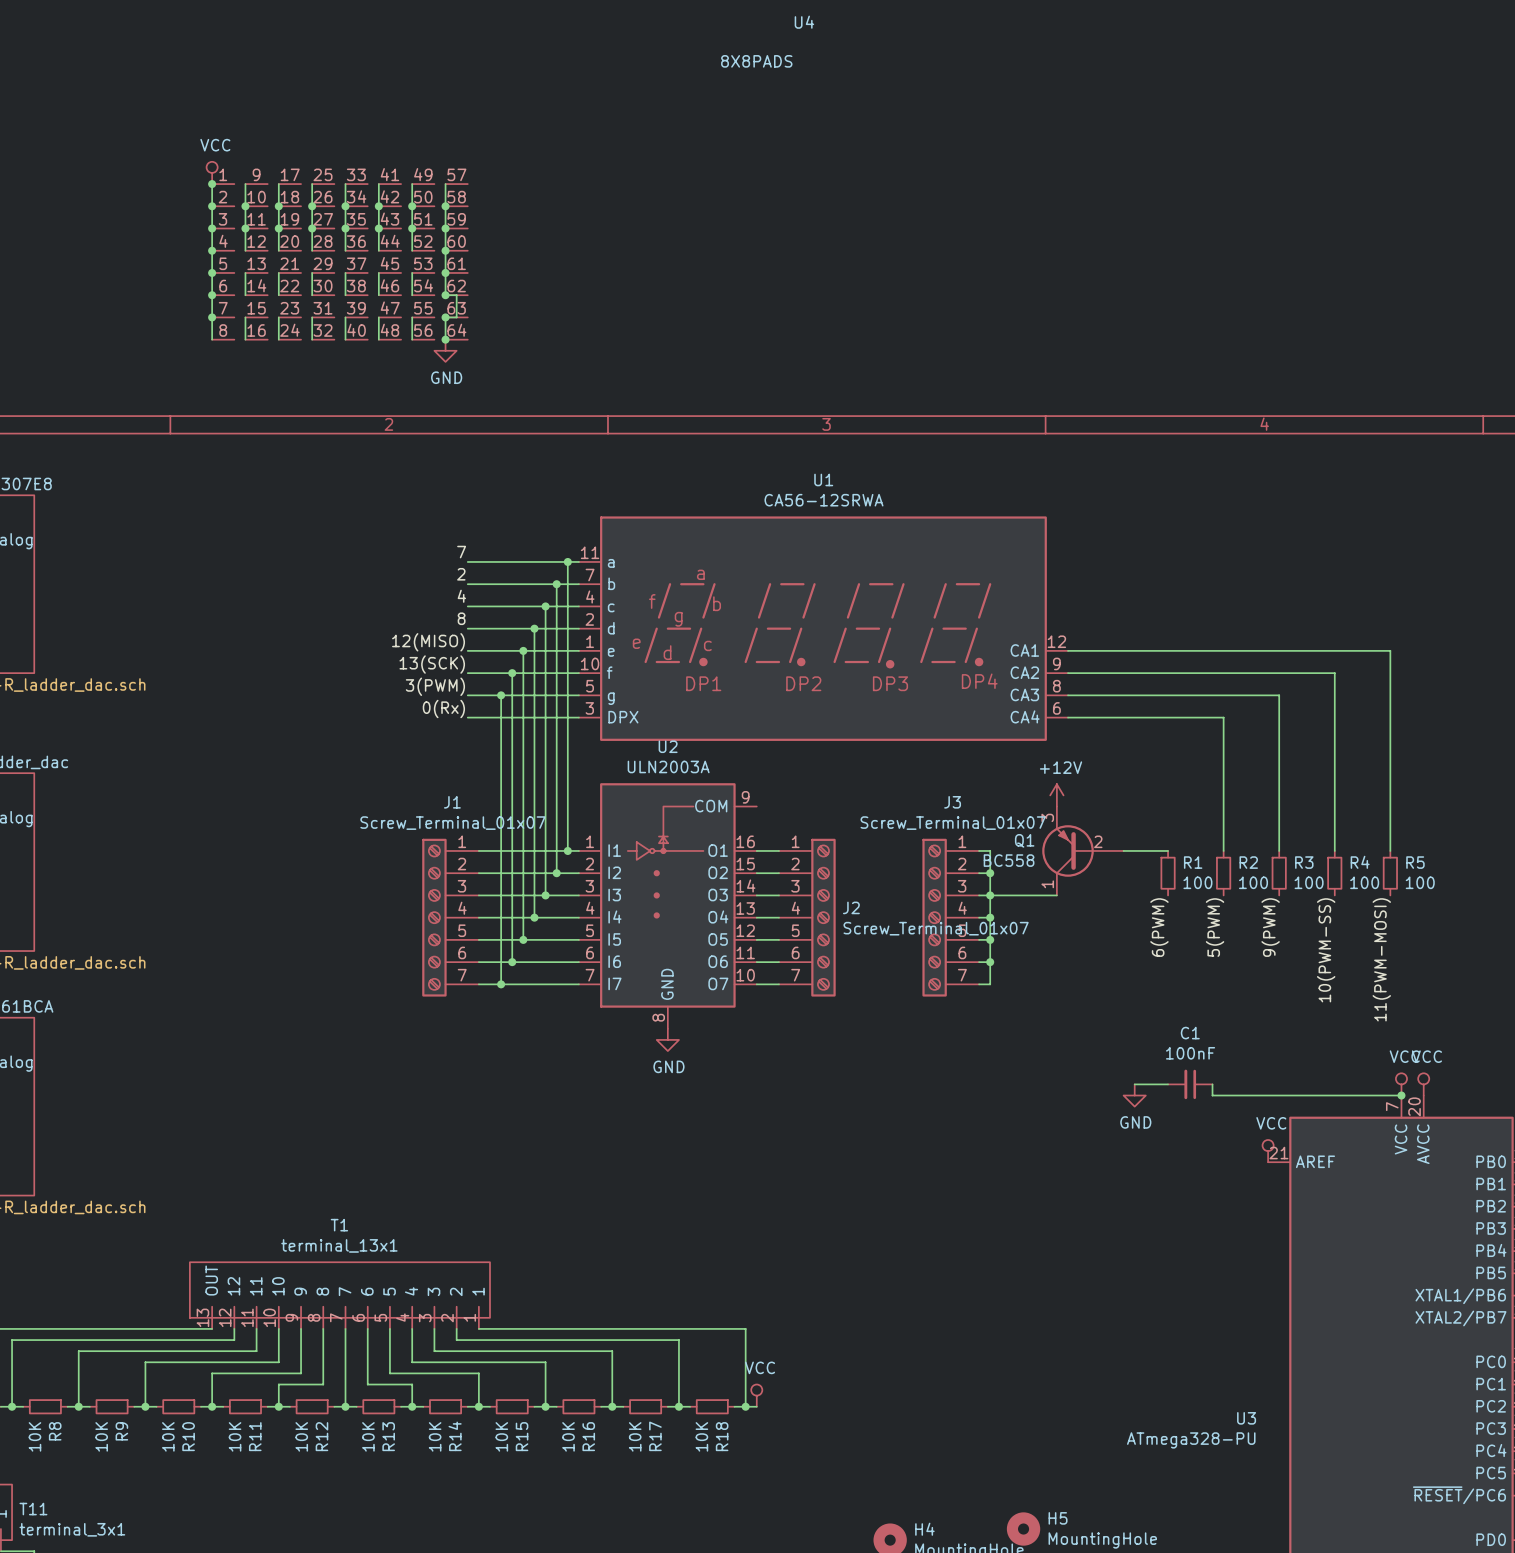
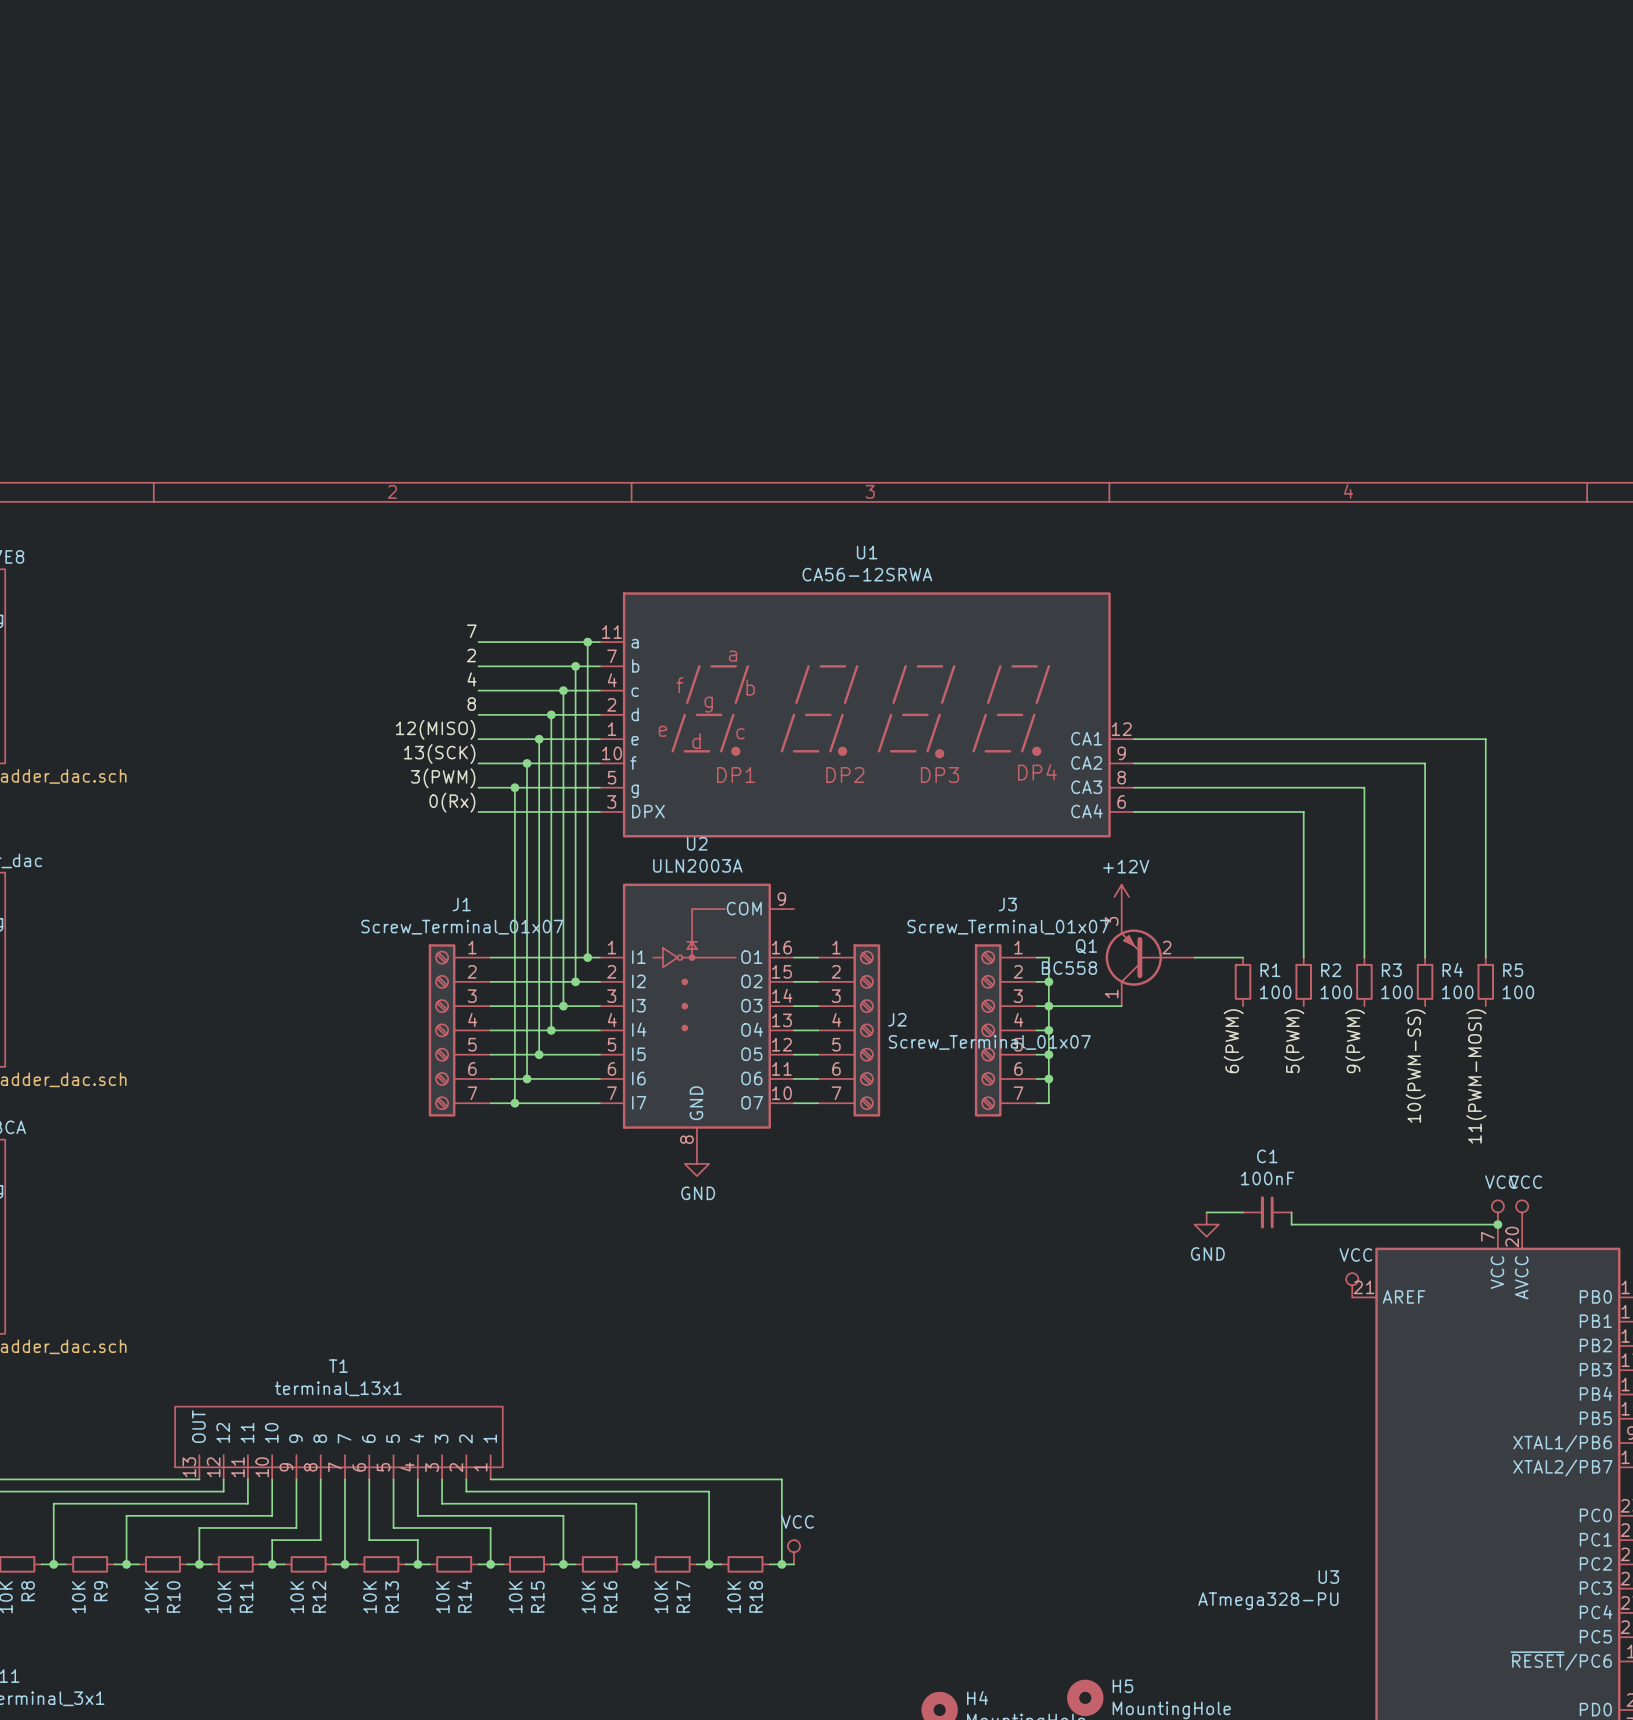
power symbol: VCC (212, 172) -> none
wire: (212, 184) (212, 339) -> none
junction: (212, 184) -> none
wire: (245, 184) (245, 250) -> none
wire: (278, 184) (278, 250) -> none
wire: (312, 184) (312, 250) -> none
wire: (345, 184) (345, 250) -> none
wire: (378, 184) (378, 250) -> none
wire: (412, 184) (412, 250) -> none
wire: (445, 184) (445, 295) (456, 295) (456, 317) (445, 317) (445, 339) -> none
junction: (212, 206) -> none
junction: (245, 206) -> none
junction: (278, 206) -> none
junction: (312, 206) -> none
junction: (345, 206) -> none
junction: (378, 206) -> none
junction: (412, 206) -> none
junction: (445, 206) -> none
junction: (212, 228) -> none
junction: (245, 228) -> none
junction: (278, 228) -> none
junction: (312, 228) -> none
junction: (345, 228) -> none
junction: (378, 228) -> none
junction: (412, 228) -> none
junction: (445, 228) -> none
junction: (212, 250) -> none
junction: (445, 250) -> none
U4: 8X8PADS (339, 261) -> none
junction: (212, 272) -> none
wire: (245, 272) (245, 295) -> none
wire: (278, 272) (278, 295) -> none
wire: (312, 272) (312, 295) -> none
wire: (345, 272) (345, 295) -> none
wire: (378, 272) (378, 295) -> none
wire: (412, 272) (412, 295) -> none
junction: (445, 272) -> none
junction: (212, 295) -> none
junction: (445, 295) -> none
junction: (212, 317) -> none
wire: (245, 317) (245, 339) -> none
wire: (278, 317) (278, 339) -> none
wire: (312, 317) (312, 339) -> none
wire: (345, 317) (345, 339) -> none
wire: (378, 317) (378, 339) -> none
wire: (412, 317) (412, 339) -> none
junction: (445, 317) -> none
junction: (445, 339) -> none
power symbol: GND (445, 350) -> none

